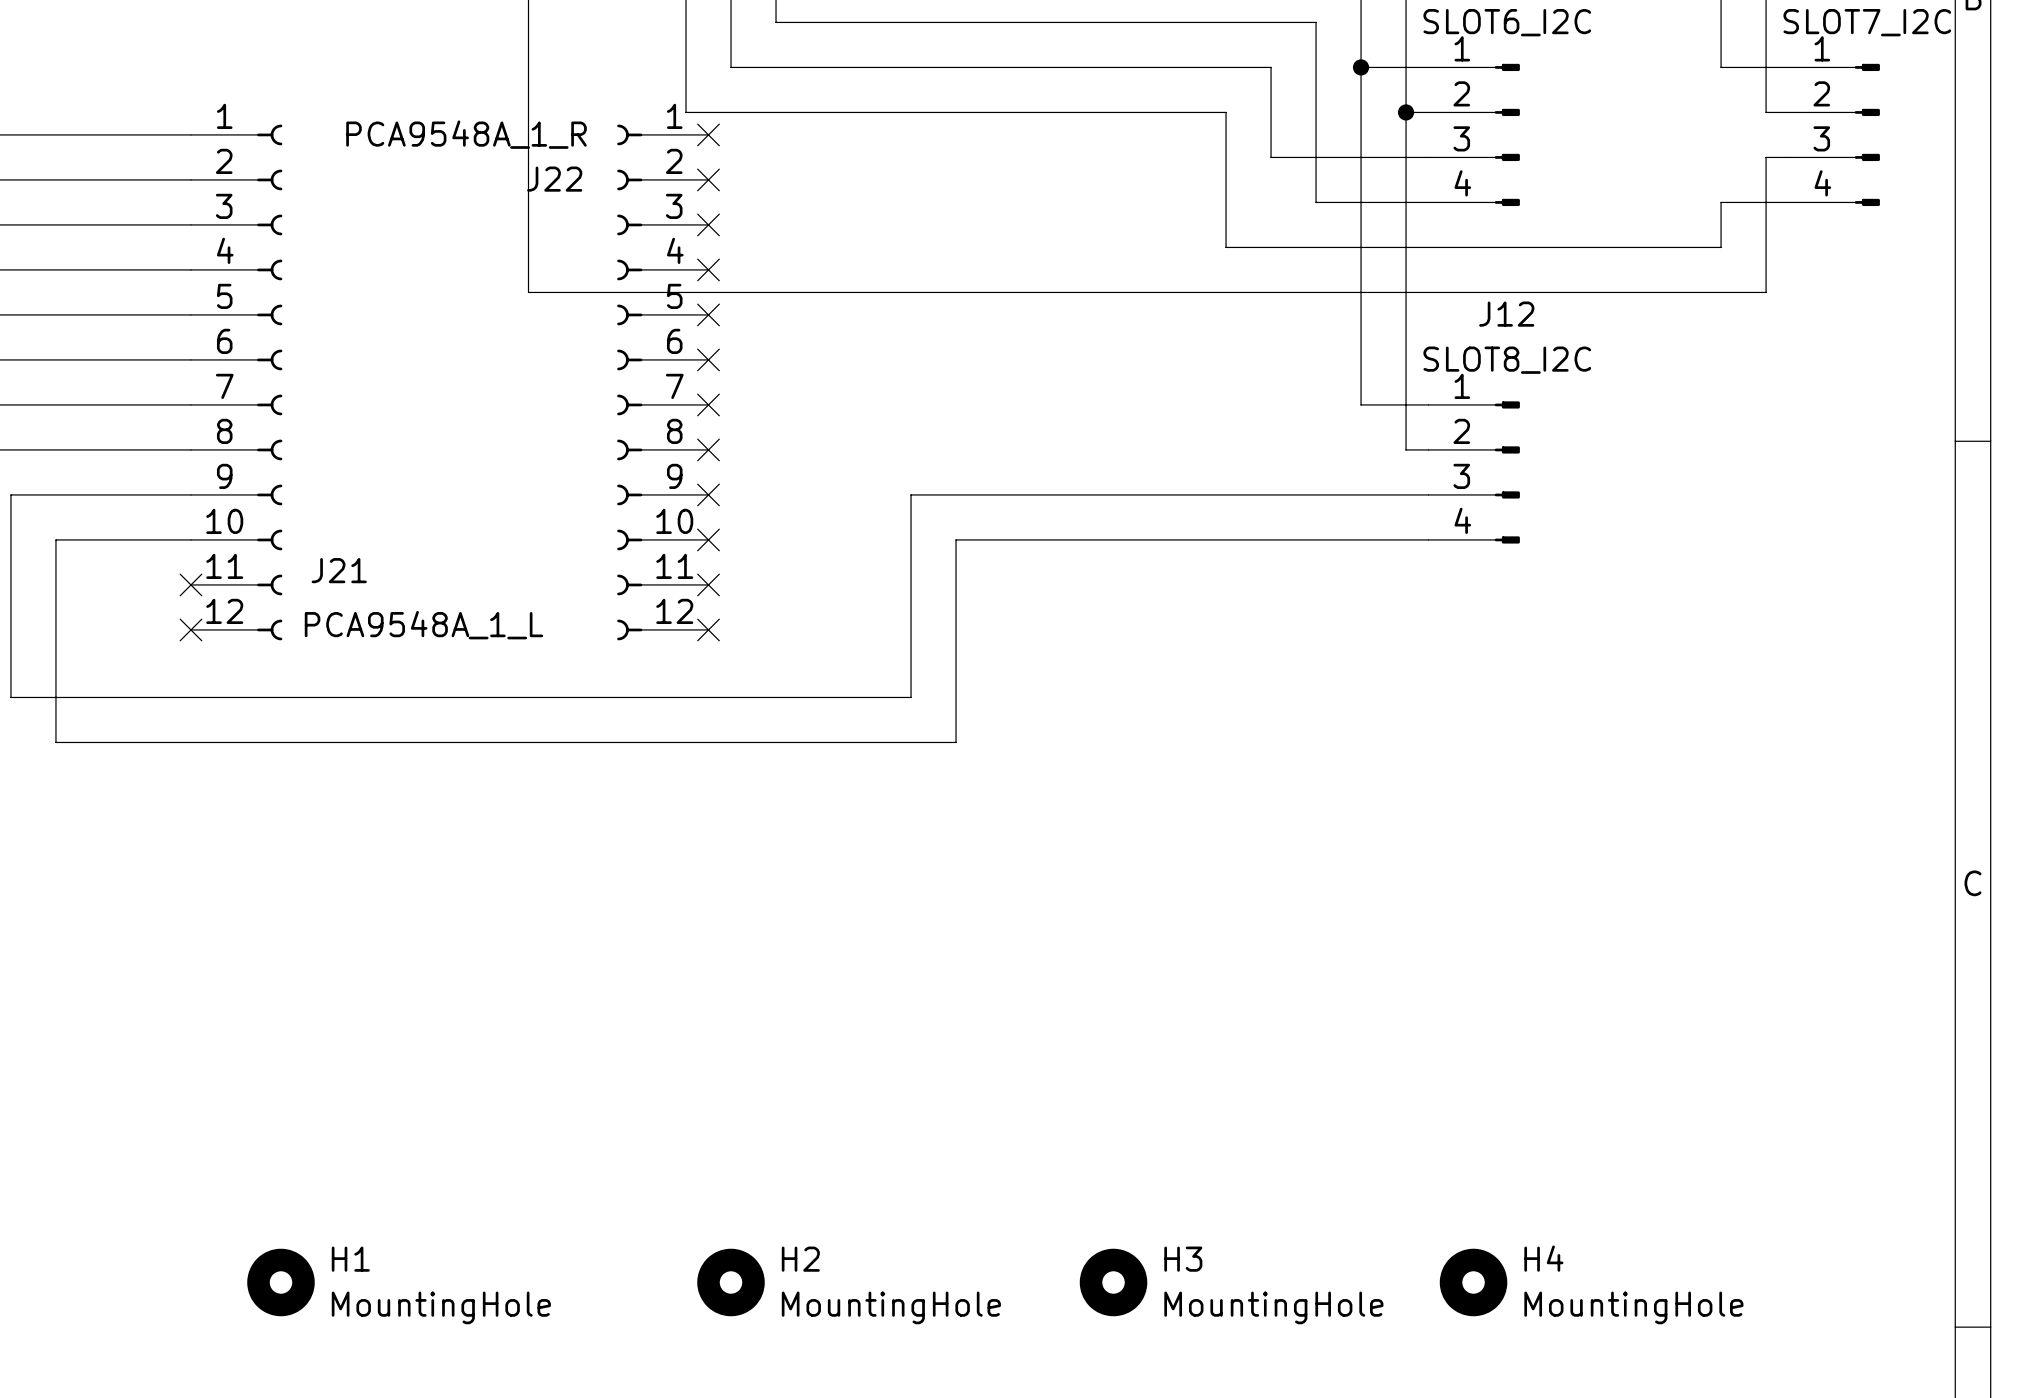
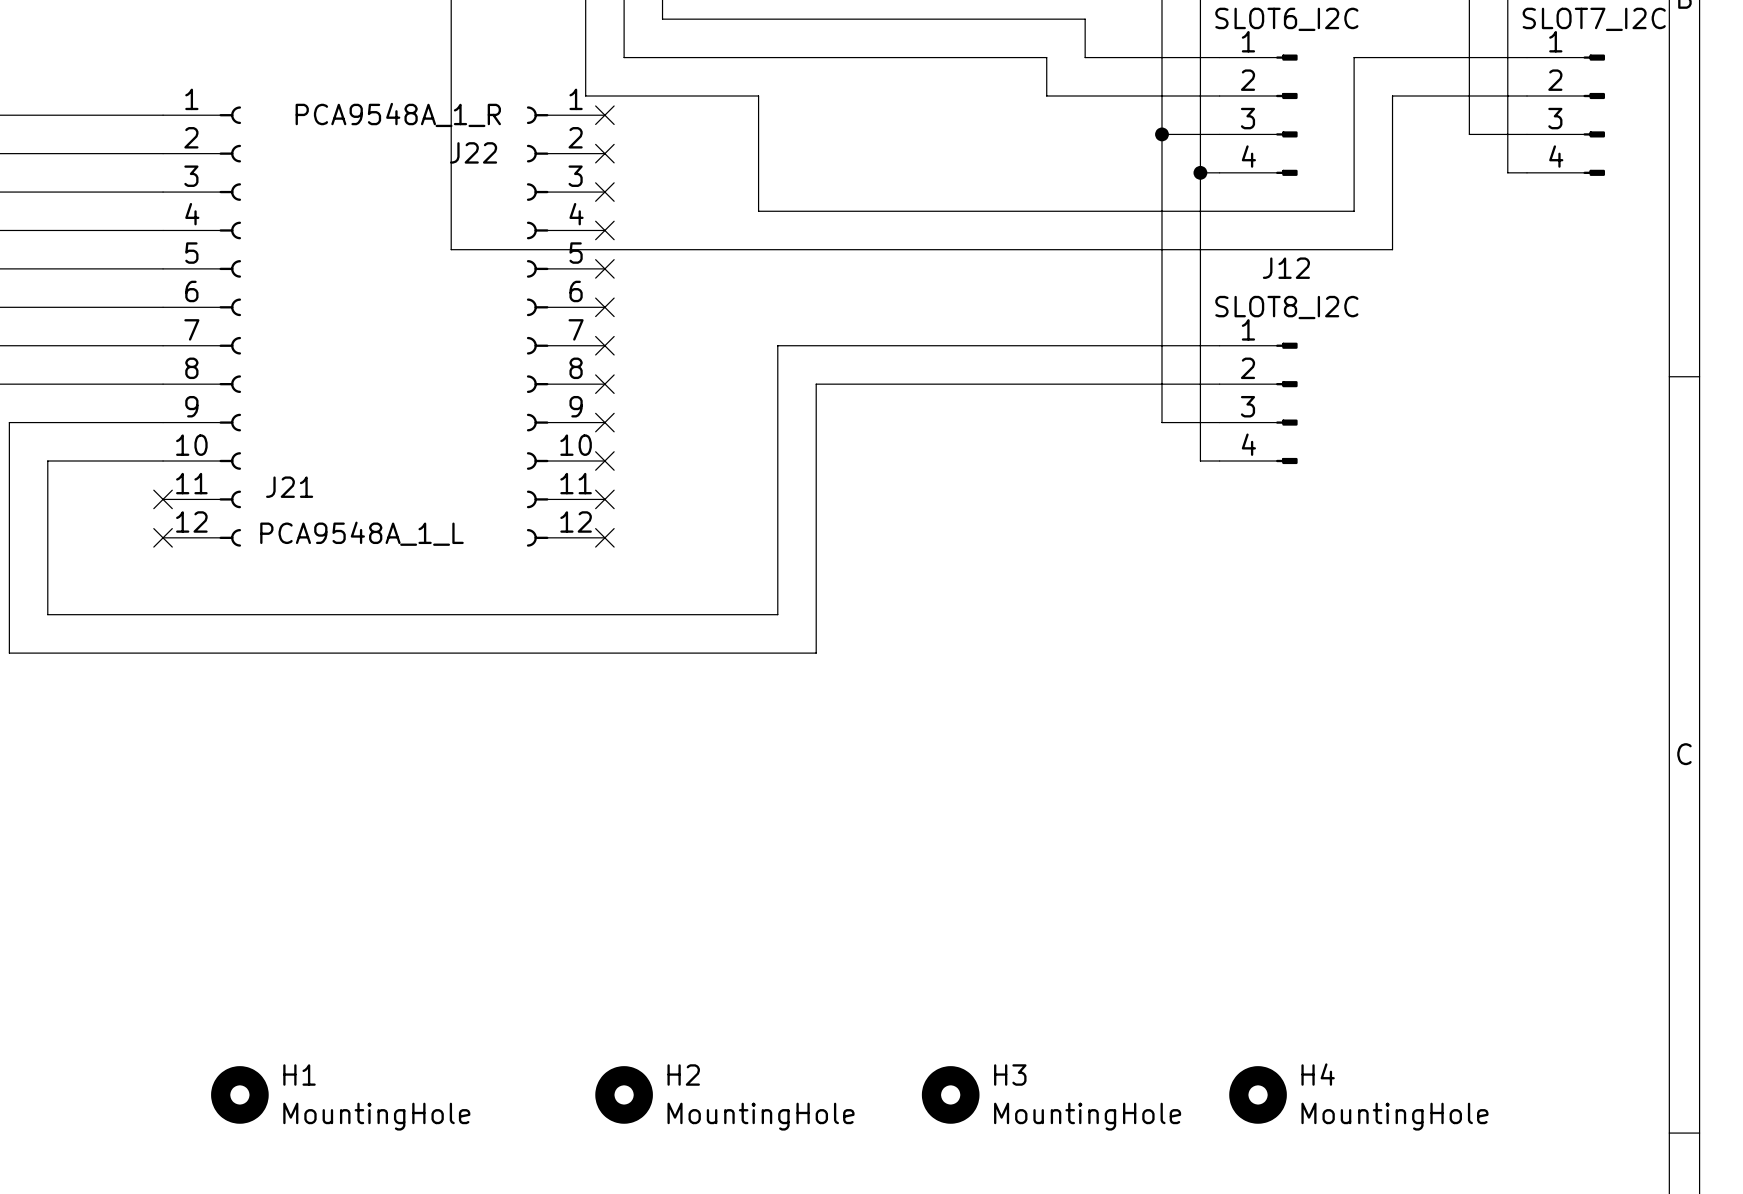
wire: (1271, 22) (1316, 22) (1316, 202) (1406, 202) -> (1085, 19) (1085, 57) (1161, 57)
wire: (1226, 67) (1271, 67) (1271, 157) (1361, 157) -> (1046, 57) (1046, 96) (1200, 96)
junction: (1361, 67) -> none
wire: (888, 112) (1226, 112) (1226, 247) -> (758, 96) (758, 211) (1046, 211)
junction: (1406, 112) -> none
junction: none -> (1161, 134)
junction: none -> (1200, 172)
wire: (1586, 247) (1721, 247) (1721, 202) (1766, 202) (1766, 292) (1631, 292) -> (1354, 211) (1354, 57) (1469, 57) (1469, 134) (1507, 134) (1507, 96) (1392, 96) (1392, 249)
wire: (911, 494) (1361, 494) -> (777, 422) (777, 345) (1161, 345) (1161, 422)
wire: (956, 539) (1406, 539) -> (816, 461) (816, 384) (1200, 384) (1200, 461)
wire: (10, 697) (911, 697) -> (47, 614) (777, 614) (777, 595)
wire: (55, 719) (55, 742) (956, 742) -> (9, 595) (9, 653) (816, 653) (816, 633)

